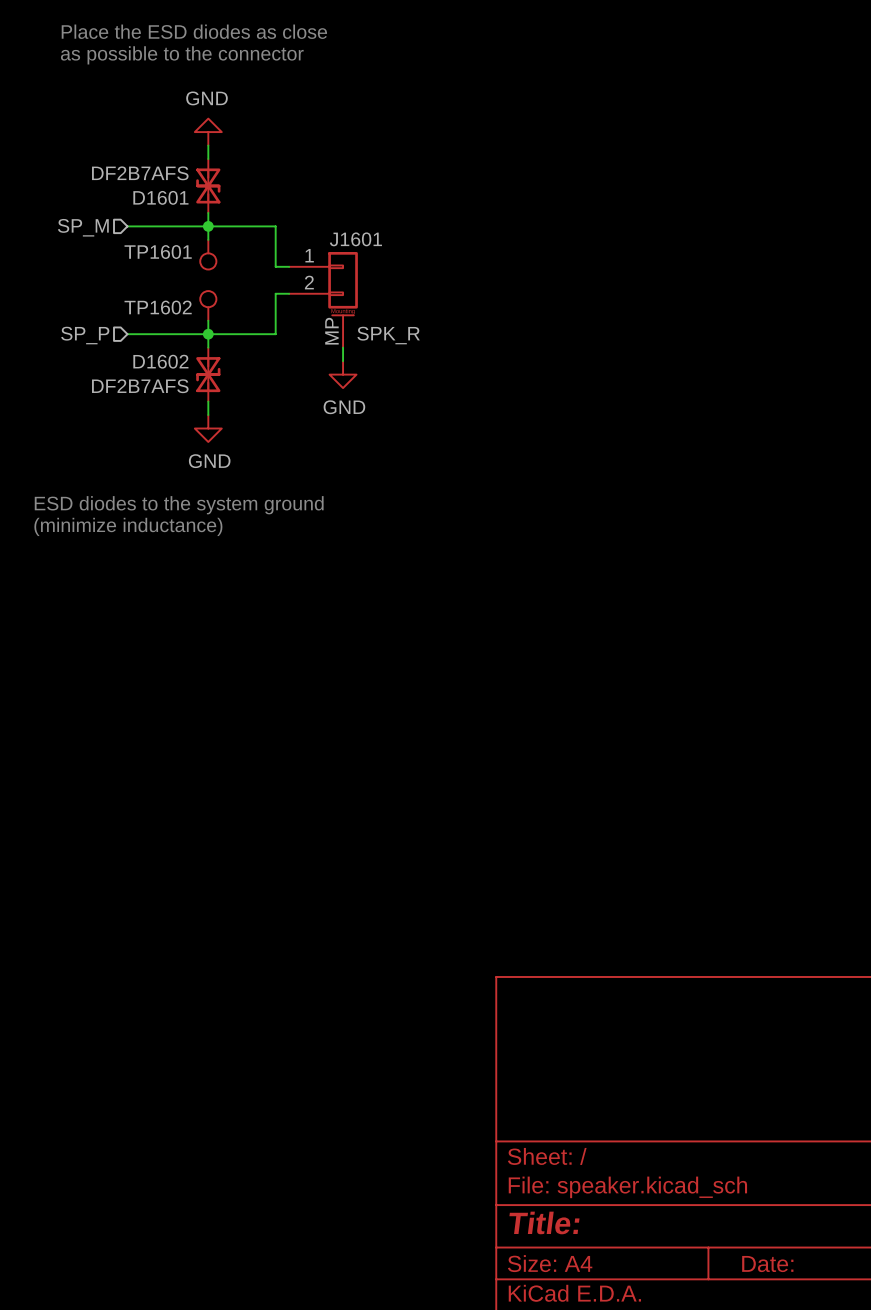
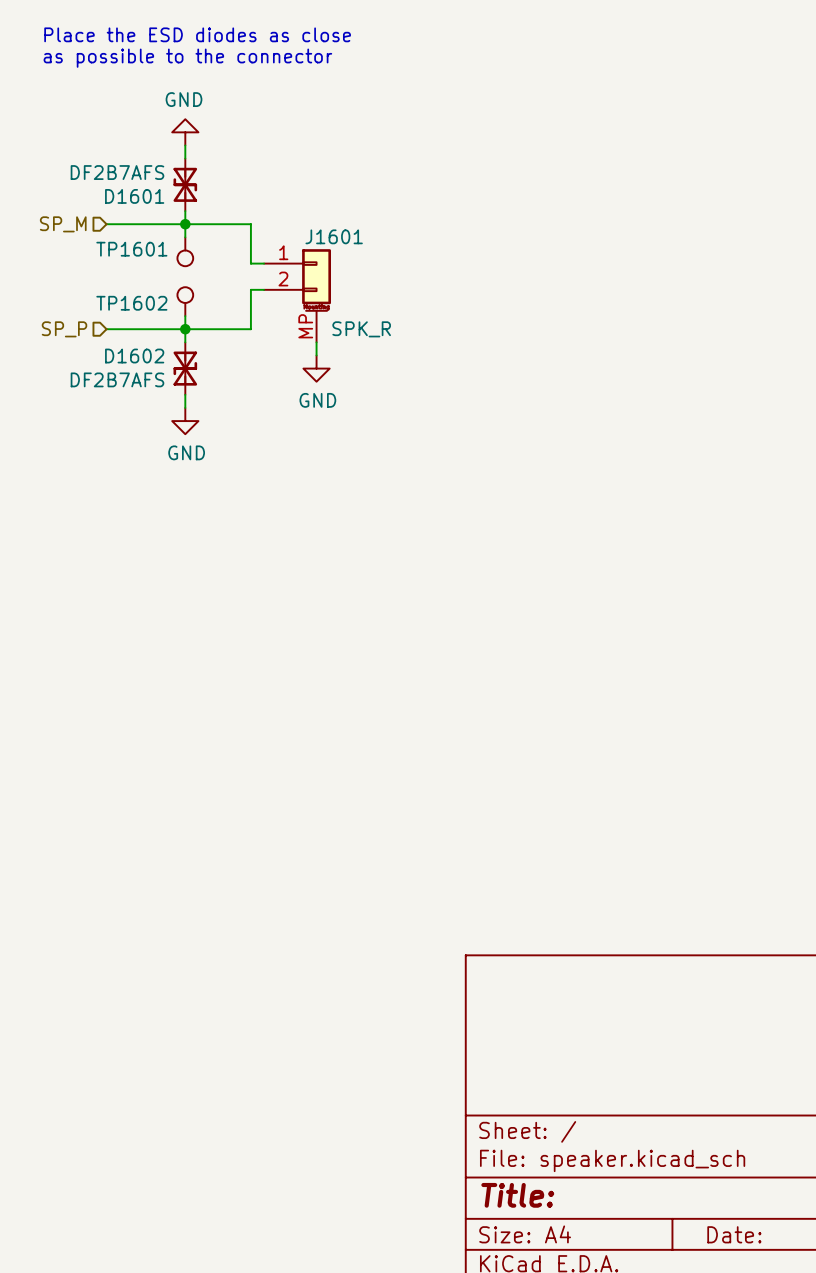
text: ESD diodes to the system ground (179, 505) -> none
text: (minimize inductance) (128, 526) -> none

